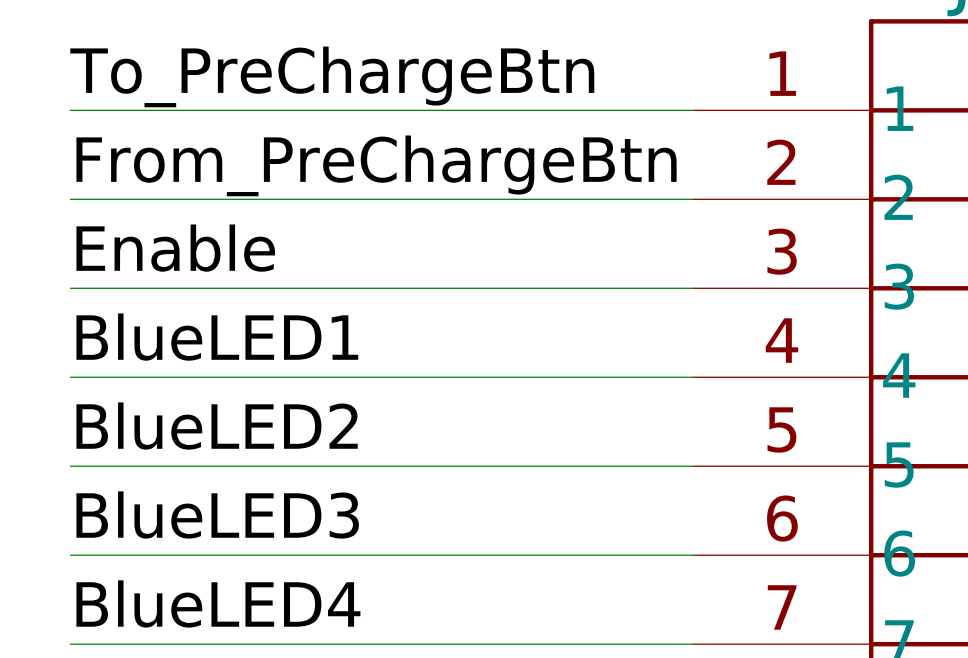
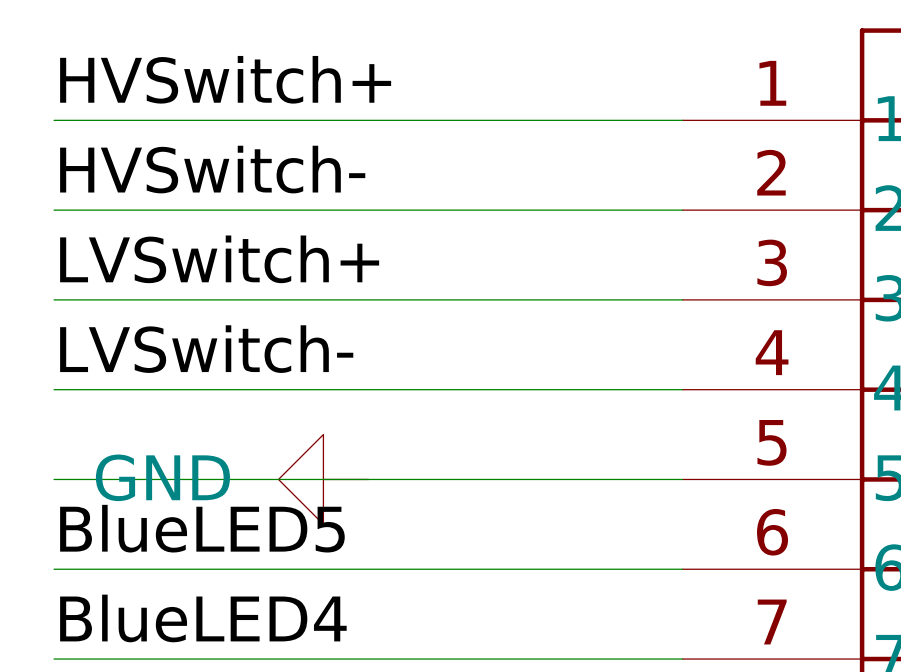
label: To_PreChargeBtn (332, 76) -> HVSwitch+ (225, 79)
label: From_PreChargeBtn (376, 165) -> HVSwitch- (212, 169)
label: Enable (175, 248) -> LVSwitch+ (219, 259)
label: BlueLED1 (217, 337) -> LVSwitch- (206, 349)
label: BlueLED2 (217, 426) -> none
power symbol: none -> GND (323, 479)
label: BlueLED3 (217, 515) -> BlueLED5 (202, 528)

